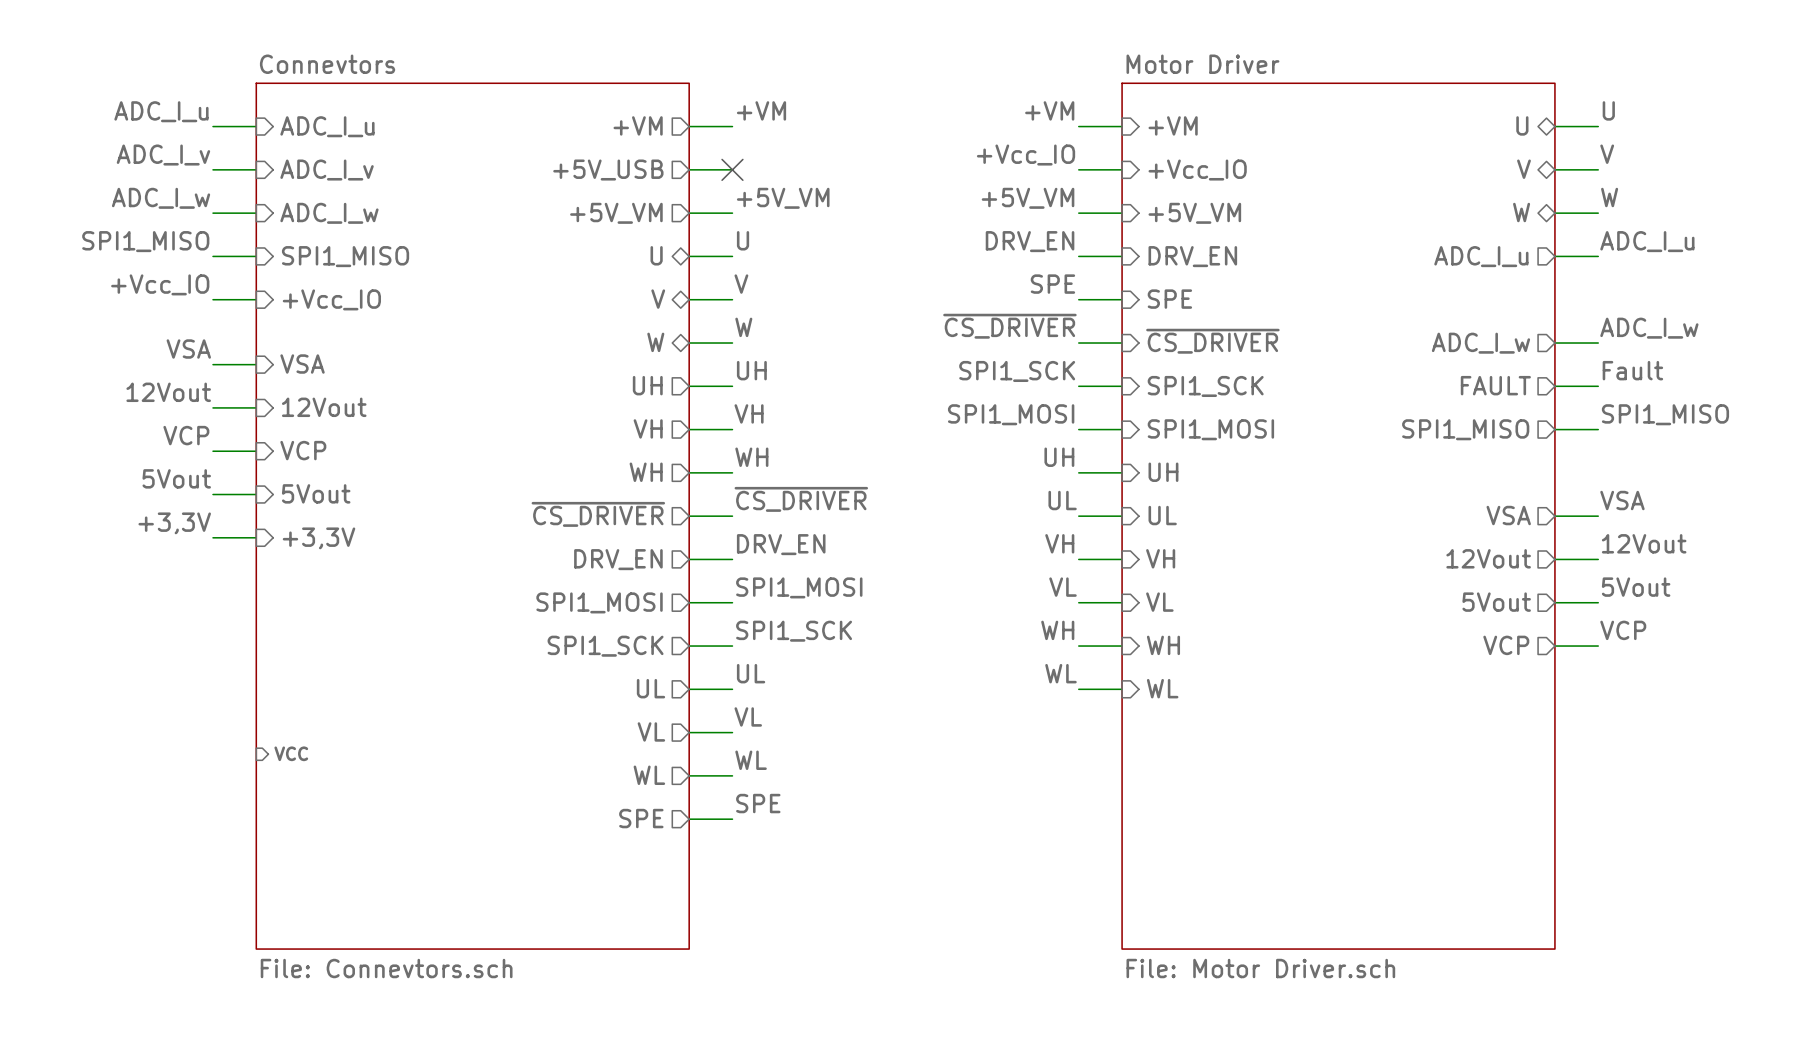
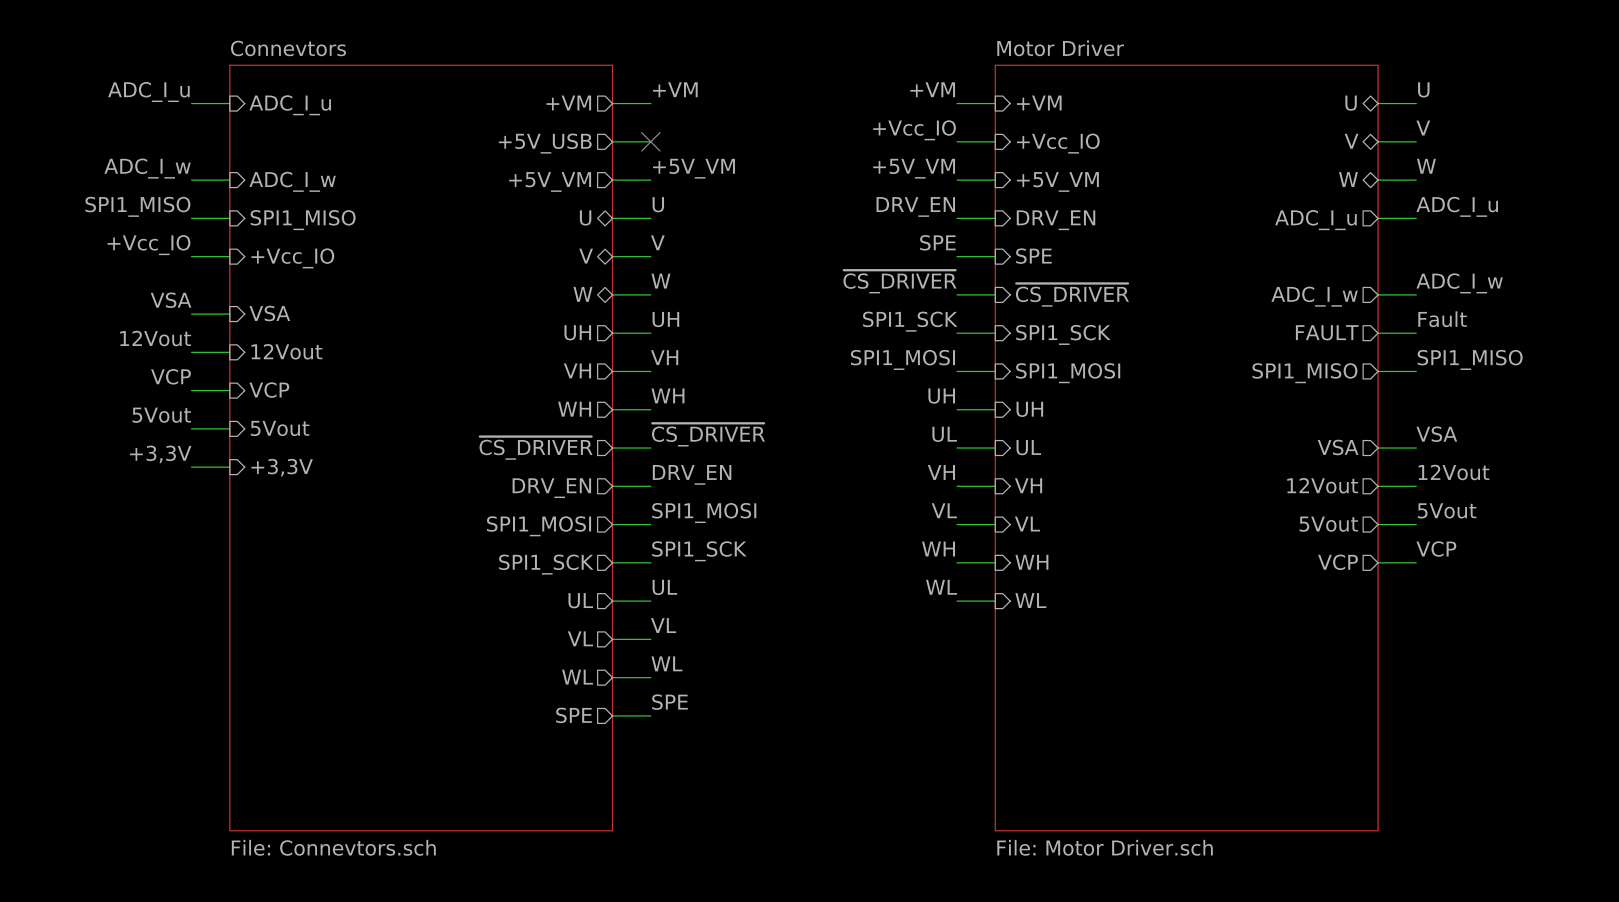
label: ADC_I_v (163, 155) -> none
wire: (213, 169) (256, 169) -> none
sheet pin: ADC_I_v (327, 170) -> none
sheet pin: VCC (291, 753) -> none

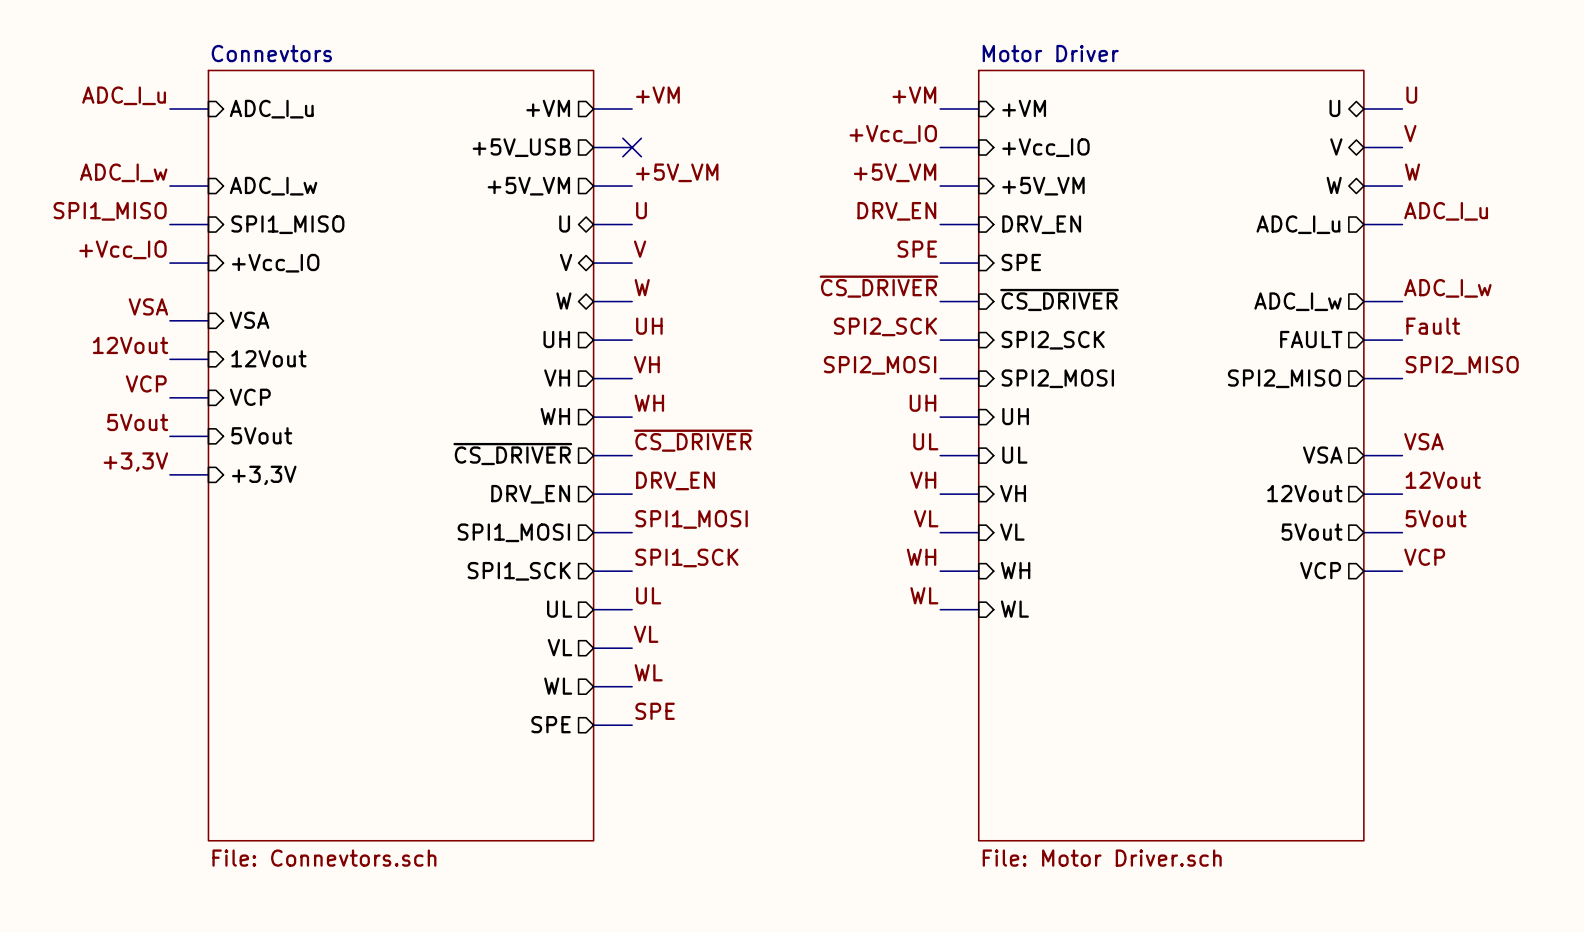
label: SPI1_SCK (910, 321) -> SPI2_SCK (885, 326)
sheet pin: SPI1_SCK (1063, 334) -> SPI2_SCK (1053, 340)
label: SPI1_MOSI (902, 359) -> SPI2_MOSI (880, 365)
label: SPI1_MISO (1470, 359) -> SPI2_MISO (1462, 365)
sheet pin: SPI1_MOSI (1068, 373) -> SPI2_MOSI (1057, 378)
sheet pin: SPI1_MISO (1304, 373) -> SPI2_MISO (1284, 378)

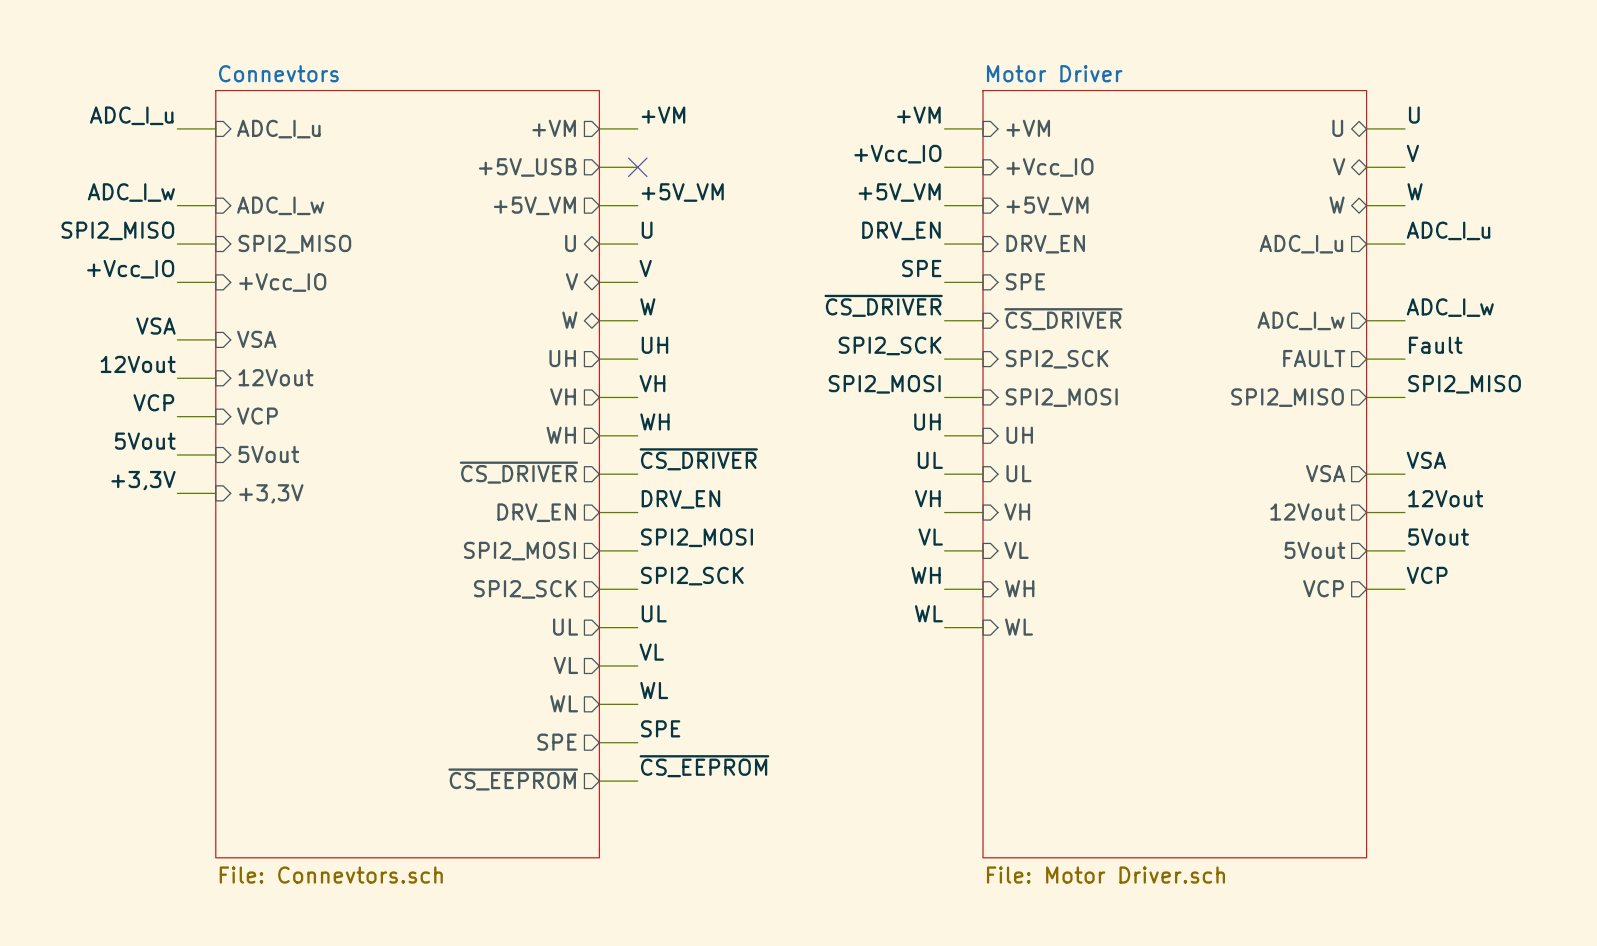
label: SPI1_MISO (110, 211) -> SPI2_MISO (117, 230)
sheet pin: SPI1_MISO (287, 224) -> SPI2_MISO (294, 244)
label: SPI1_MOSI (691, 519) -> SPI2_MOSI (696, 537)
sheet pin: SPI1_MOSI (513, 532) -> SPI2_MOSI (519, 551)
label: SPI1_SCK (686, 557) -> SPI2_SCK (692, 576)
sheet pin: SPI1_SCK (519, 571) -> SPI2_SCK (525, 589)
label: none -> ~{CS_EEPROM} (704, 766)
sheet pin: none -> ~{CS_EEPROM} (513, 779)
wire: none -> (599, 781) (637, 781)

